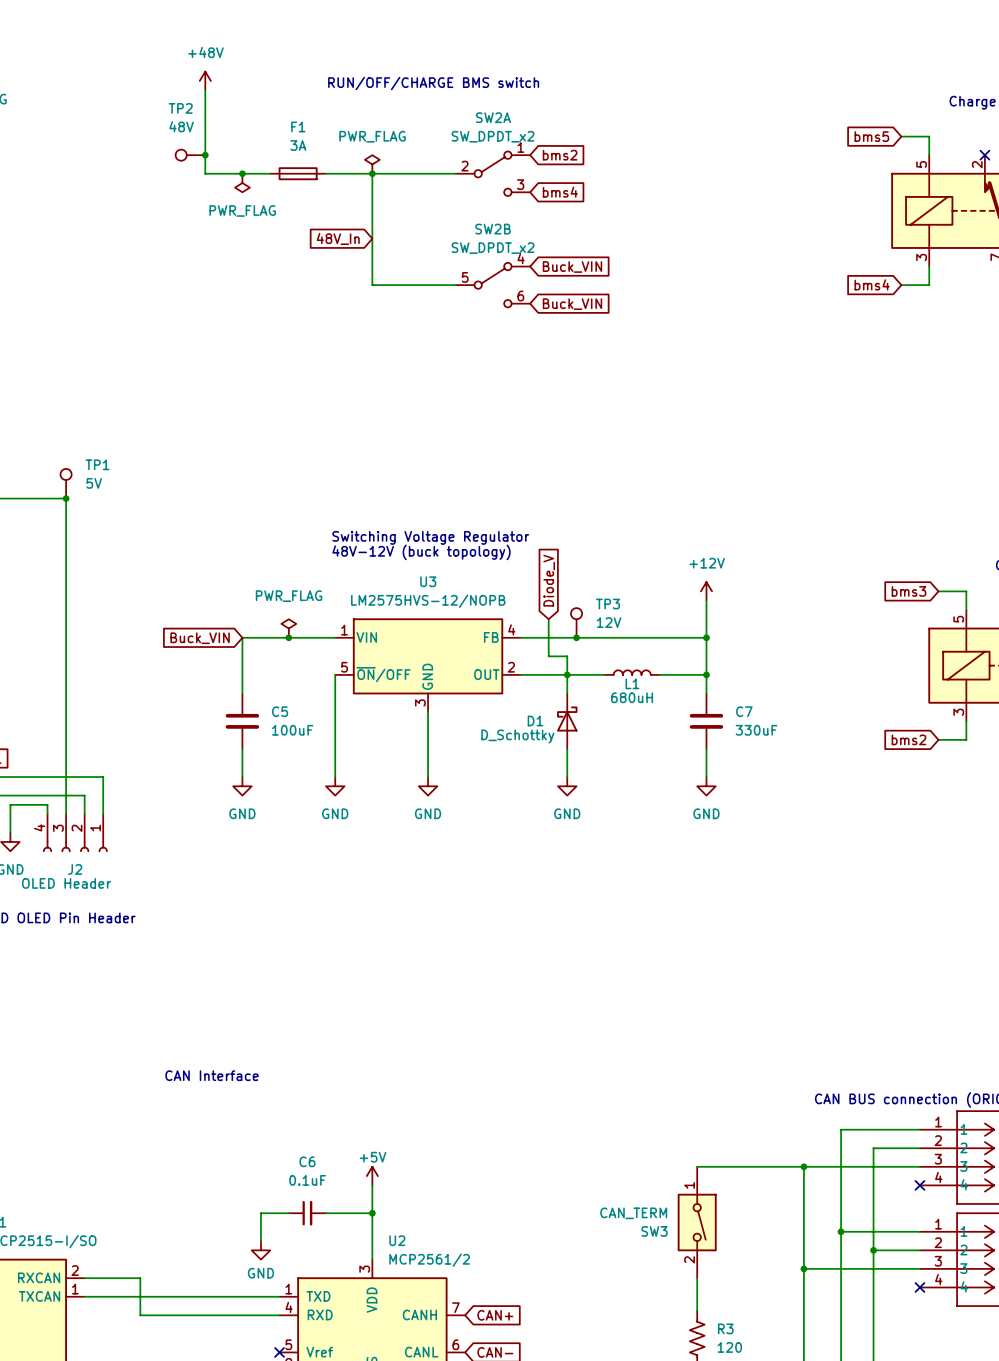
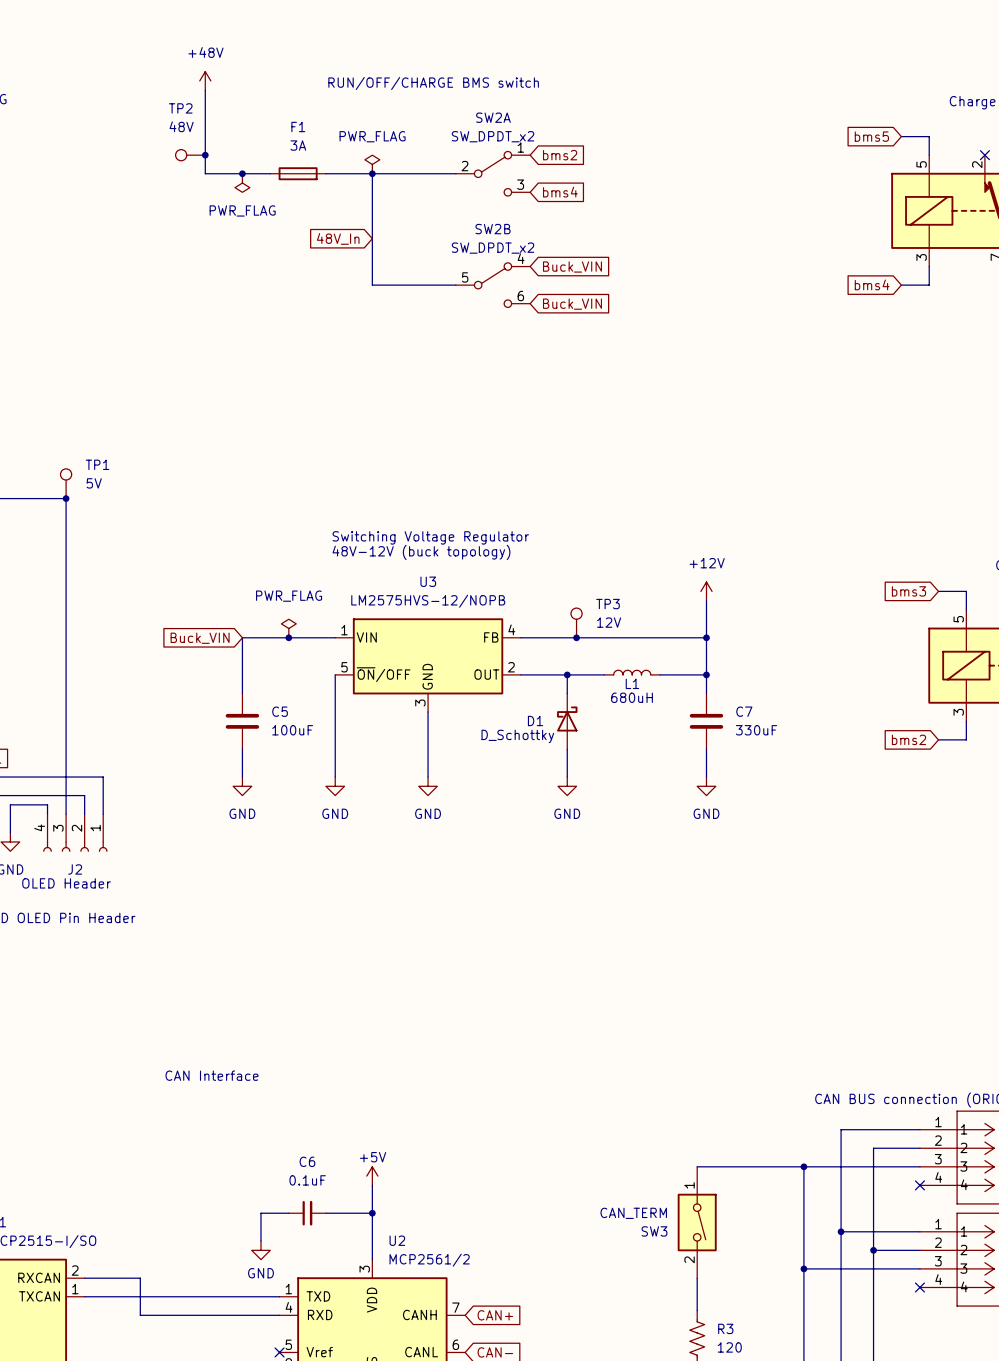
global label: Diode_V (549, 580) -> none
wire: (548, 619) (548, 656) (567, 656) (567, 674) -> none

